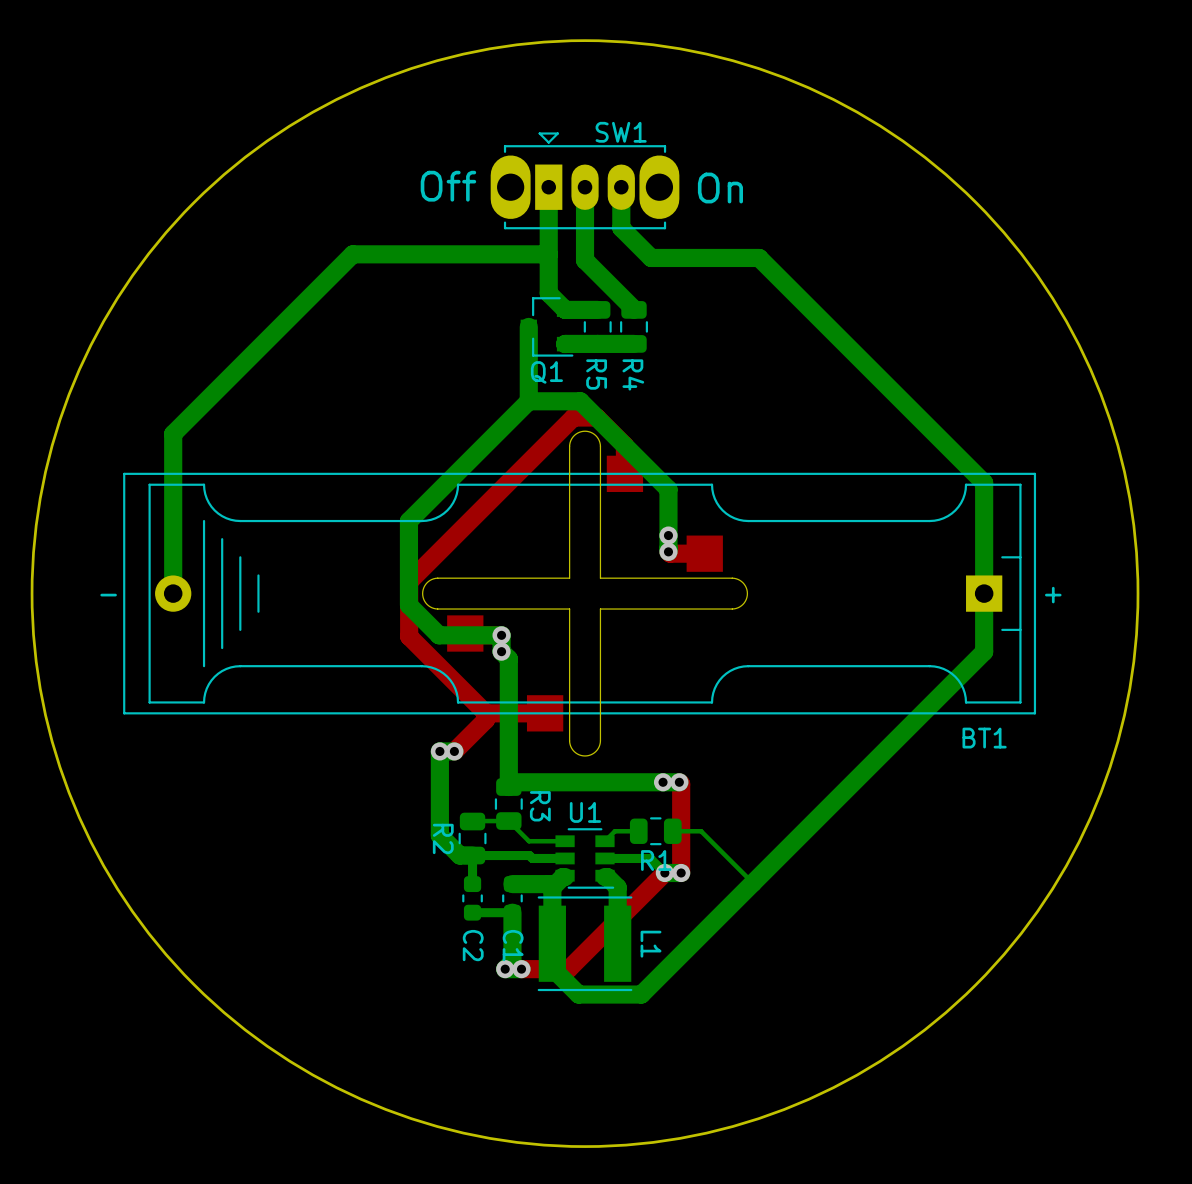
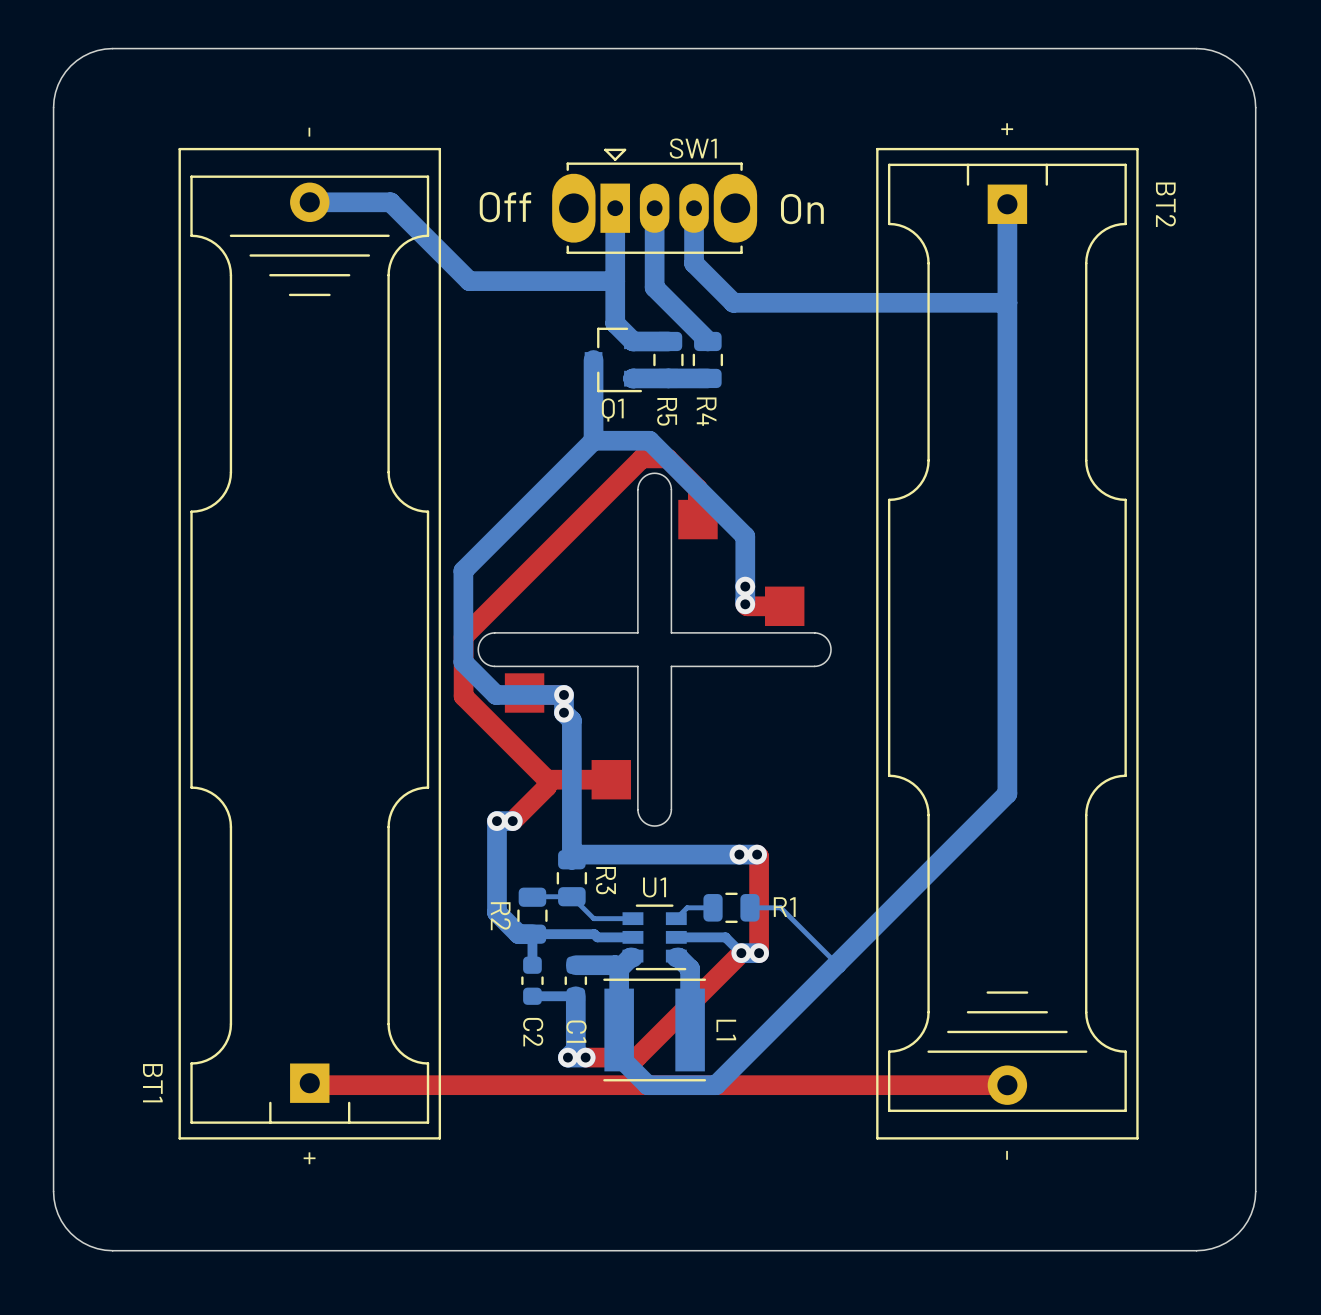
round board edge: [30, 39, 1140, 1148] -> none
board edge: none -> (1196, 48) (112, 48) (90, 53) (70, 65) (58, 85) (53, 107) (53, 1191) (58, 1214) (70, 1233) (90, 1246) (112, 1250) (1196, 1250) (1219, 1246) (1238, 1233) (1251, 1214) (1255, 1191) (1255, 107) (1251, 85) (1238, 65) (1219, 53) (1196, 48)
bottom track: (621, 228) (651, 257) (759, 257) (984, 482) (984, 651) (909, 726) -> (1007, 204) (1007, 793)
bottom track: none -> (694, 252) (694, 263) (733, 302) (1007, 302)
bottom track: (414, 254) (352, 254) (173, 433) (173, 593) -> (469, 281) (390, 202) (309, 202)
BT2: none -> (1007, 643)
BT1 rotation: 0° (579, 593) -> 90° clockwise (309, 643)
R1 name position: R1 (656, 860) -> R1 (784, 907)
top track: none -> (309, 1083) (311, 1085) (1007, 1085)

